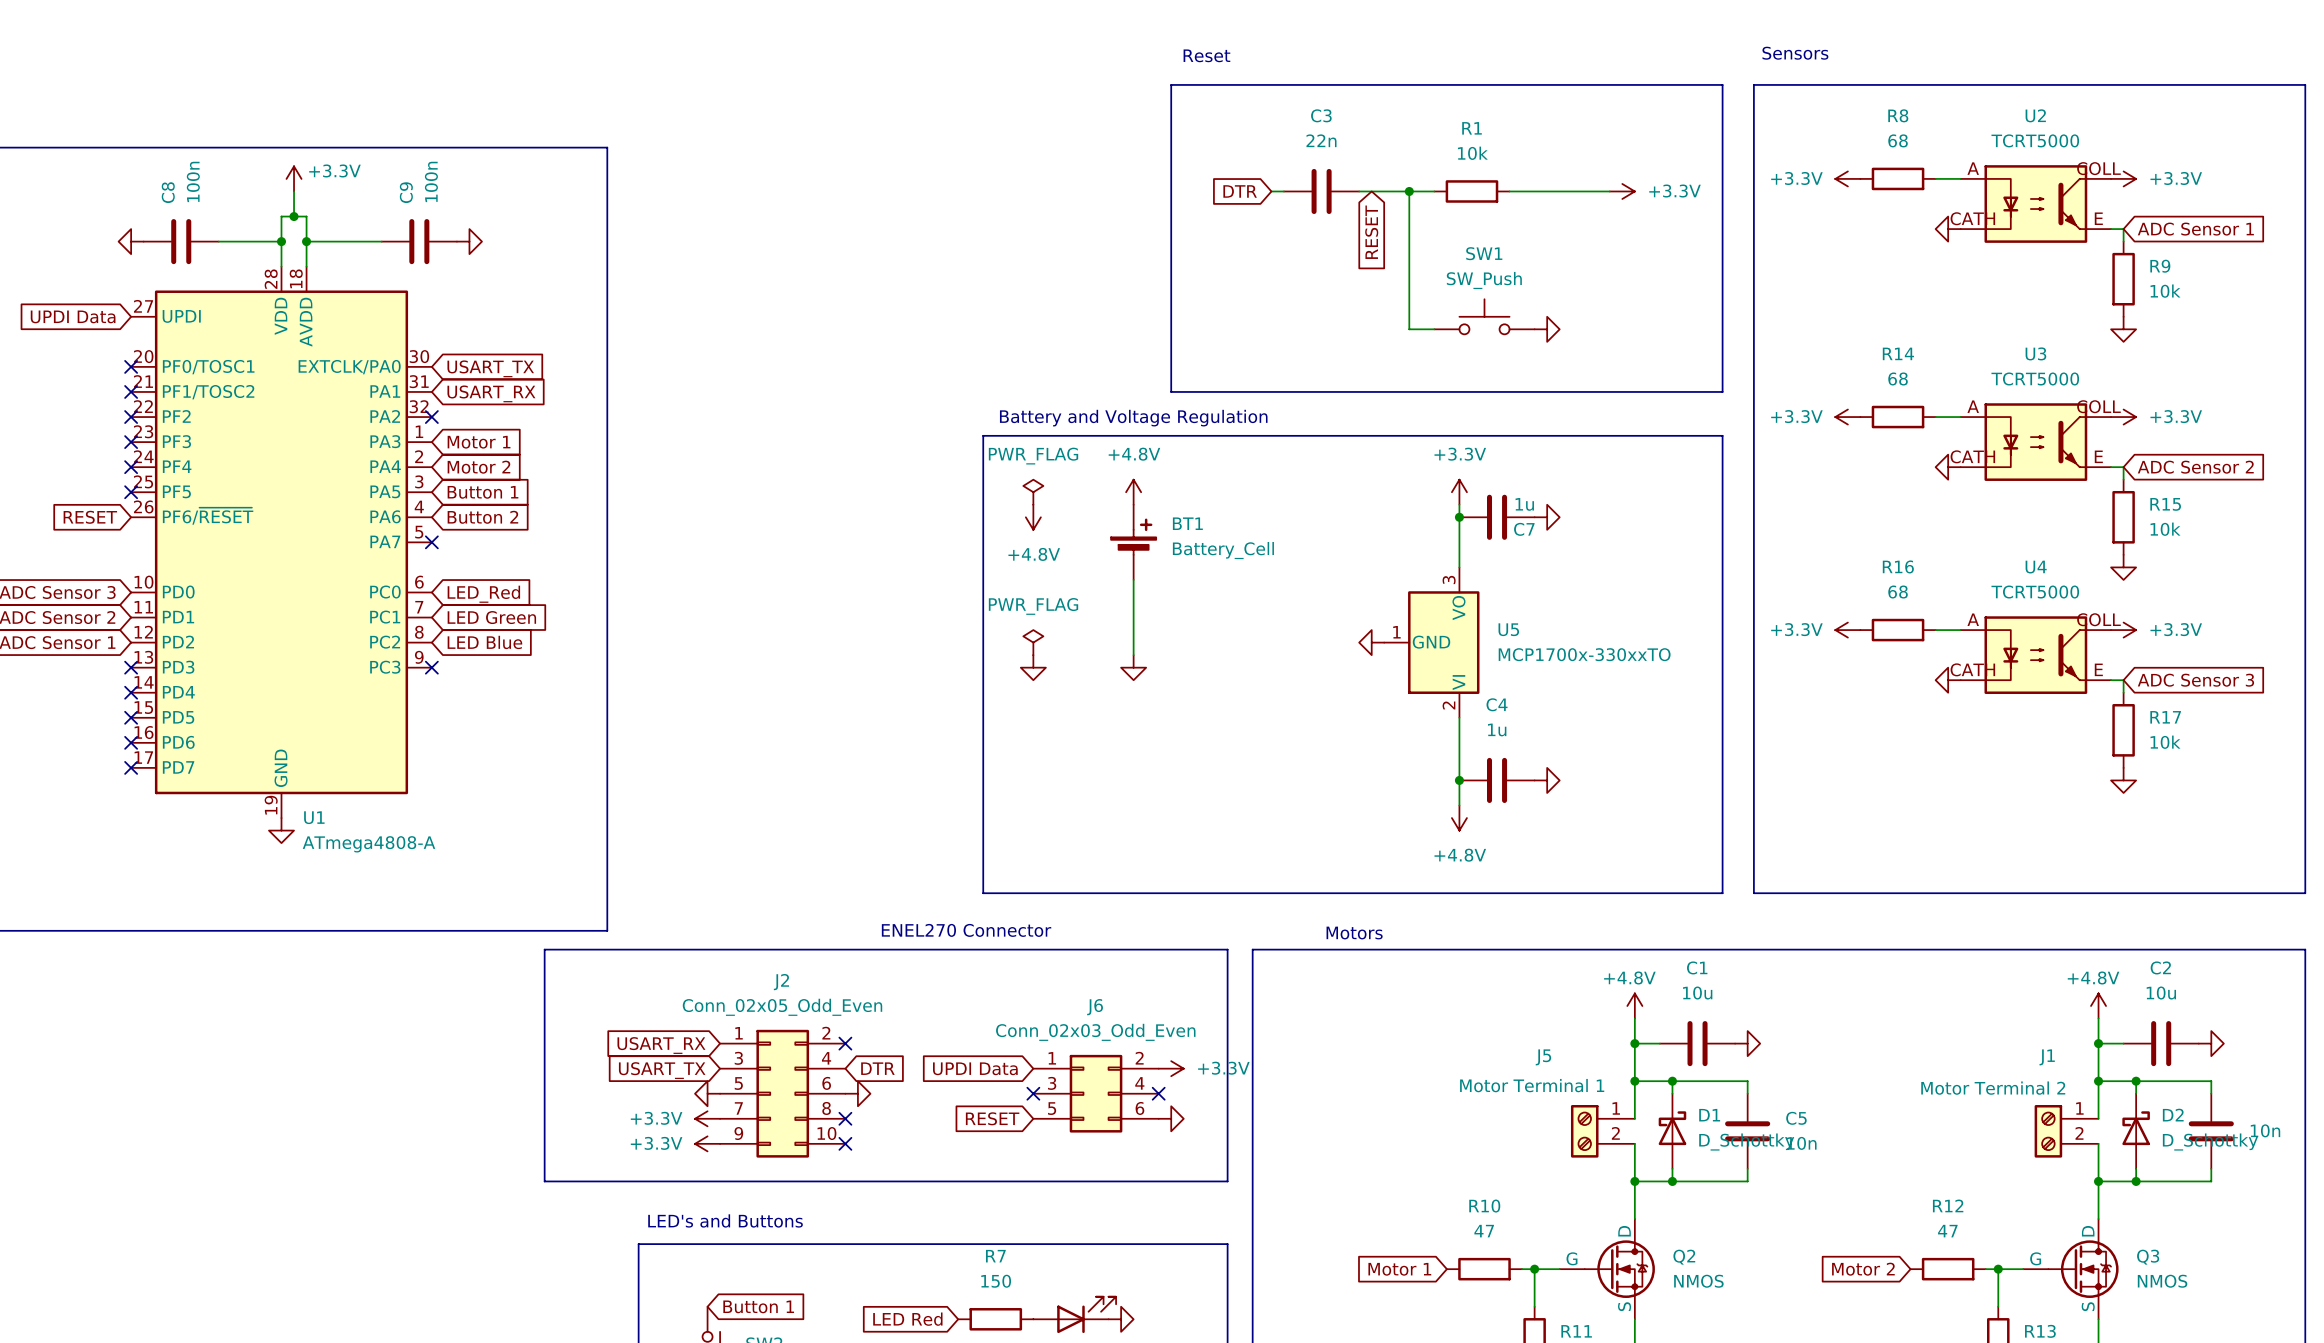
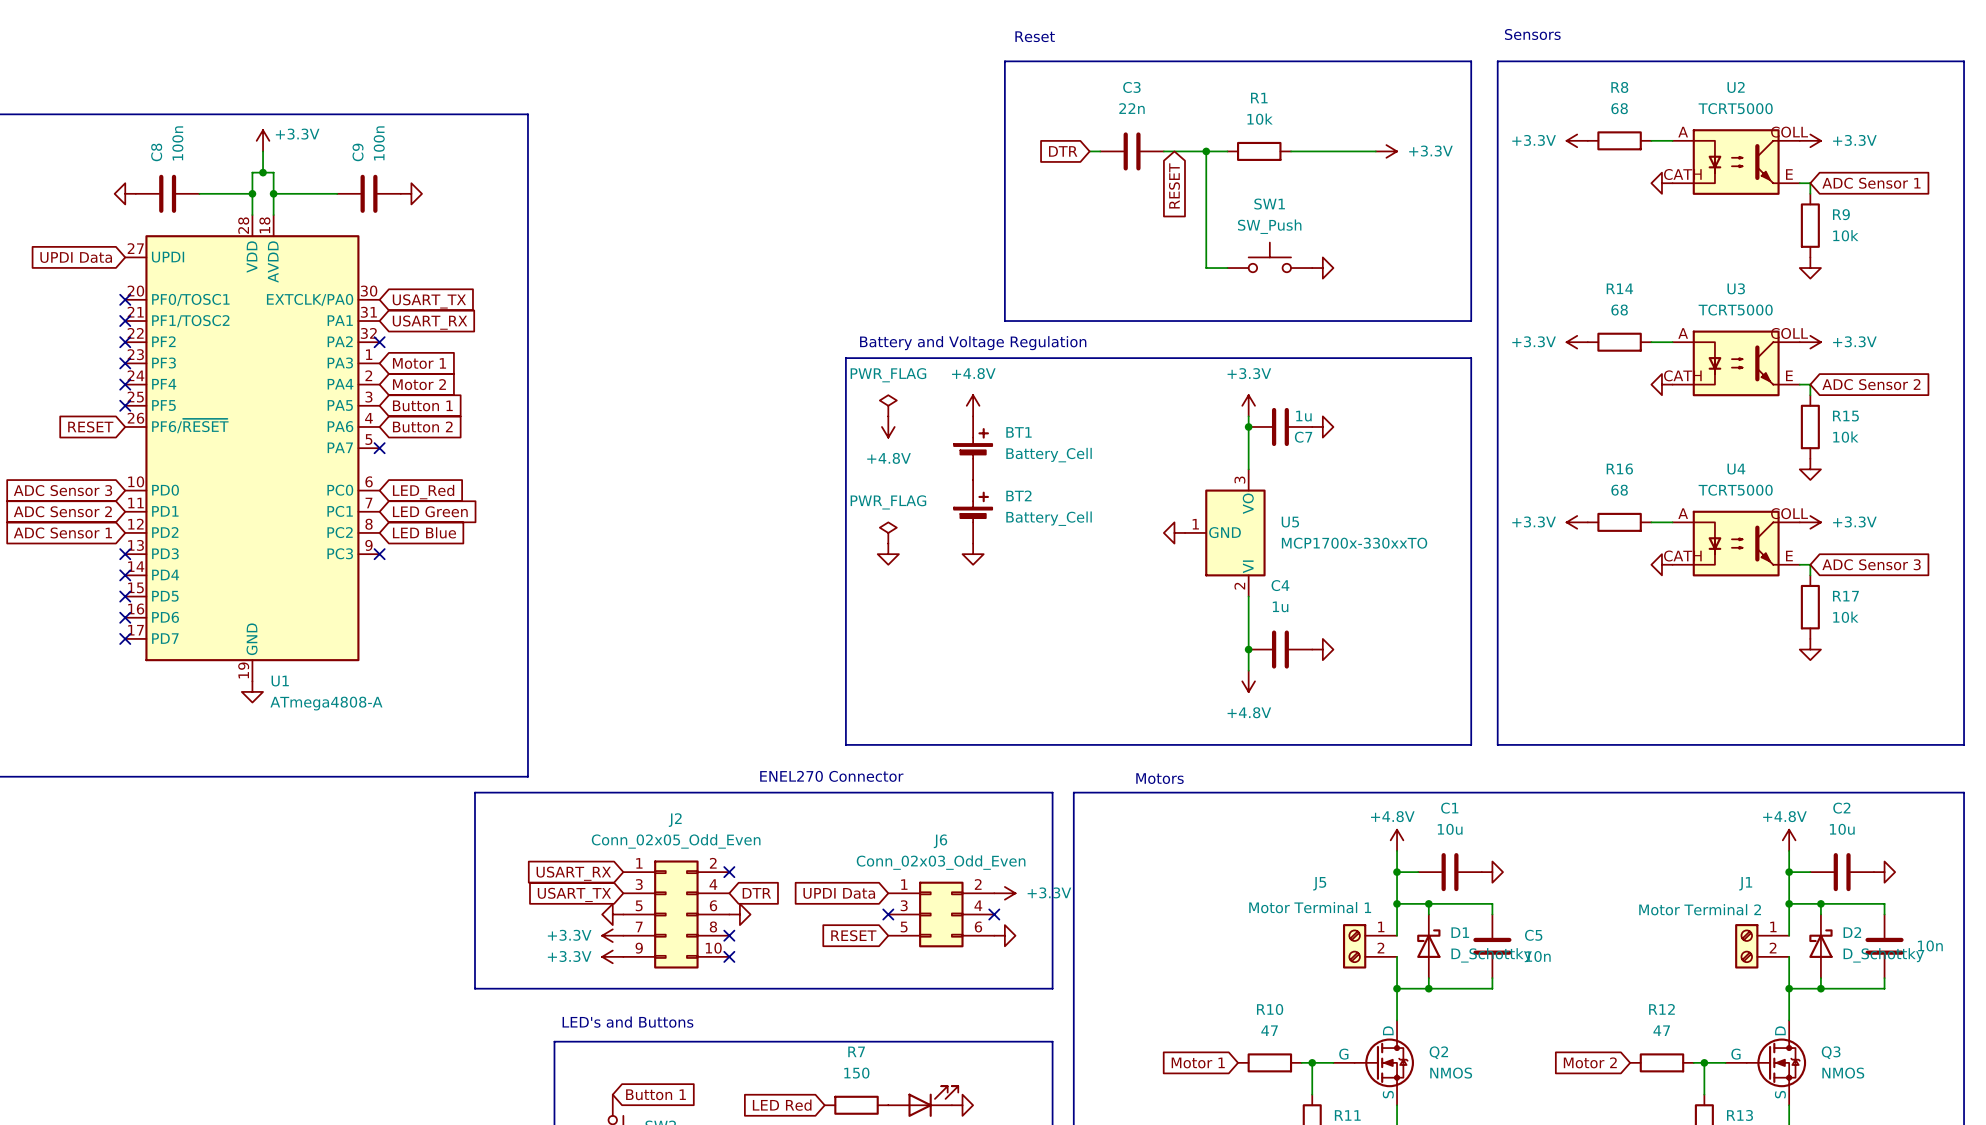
BT2: none -> Battery_Cell (973, 511)

